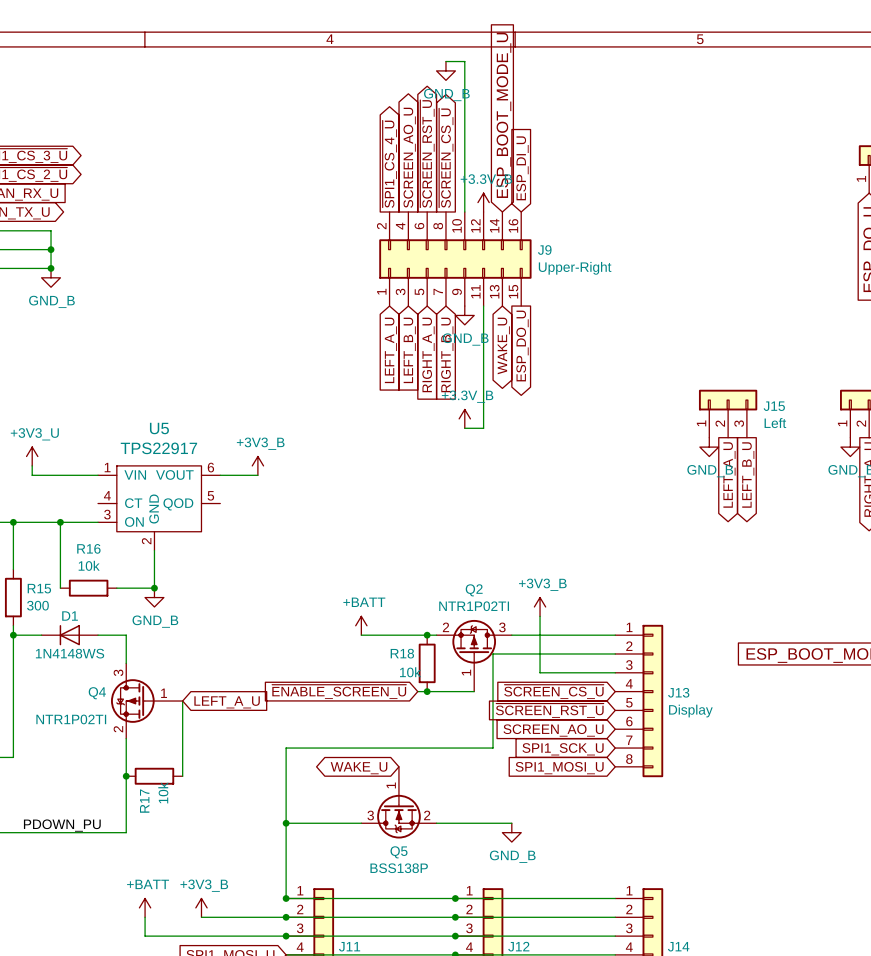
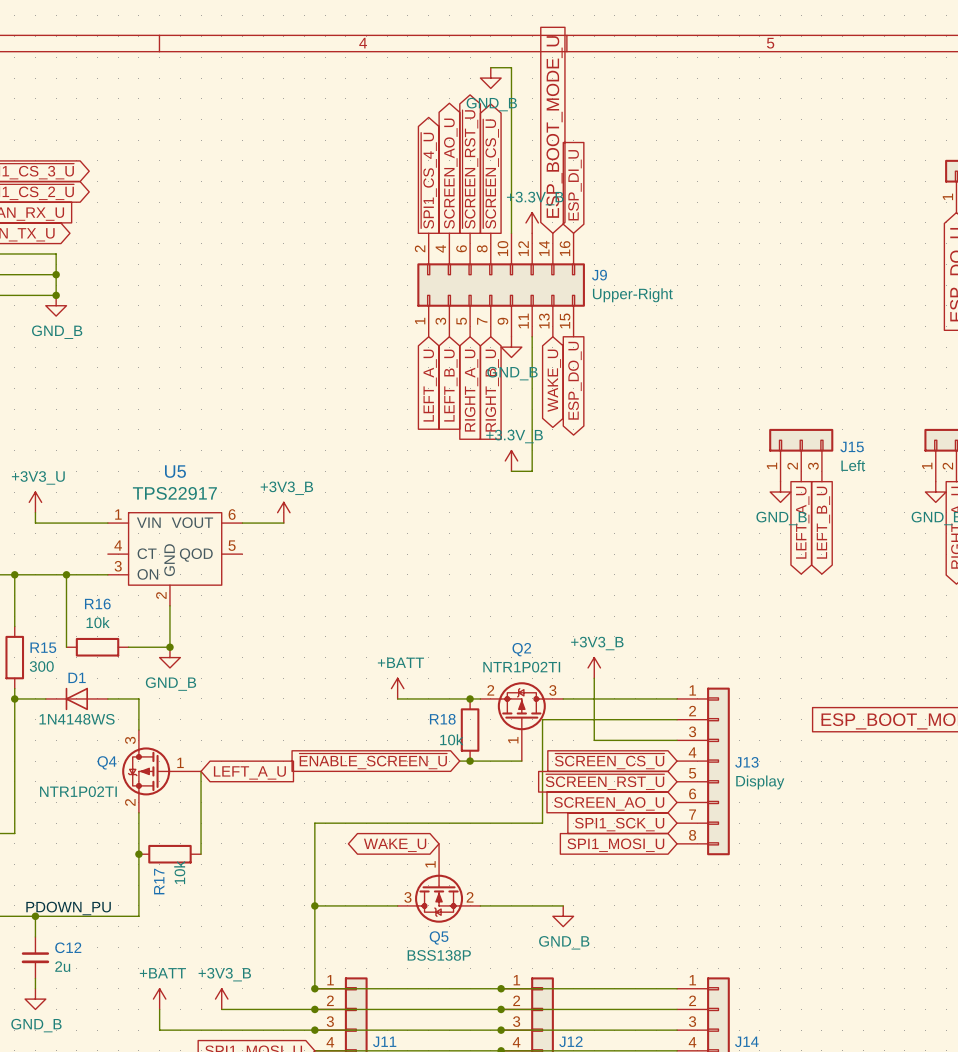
wire: none -> (35, 916) (35, 937)
junction: none -> (35, 916)
C12: none -> 2u (35, 957)
wire: none -> (35, 978) (35, 988)
power symbol: none -> GND_B (35, 999)

